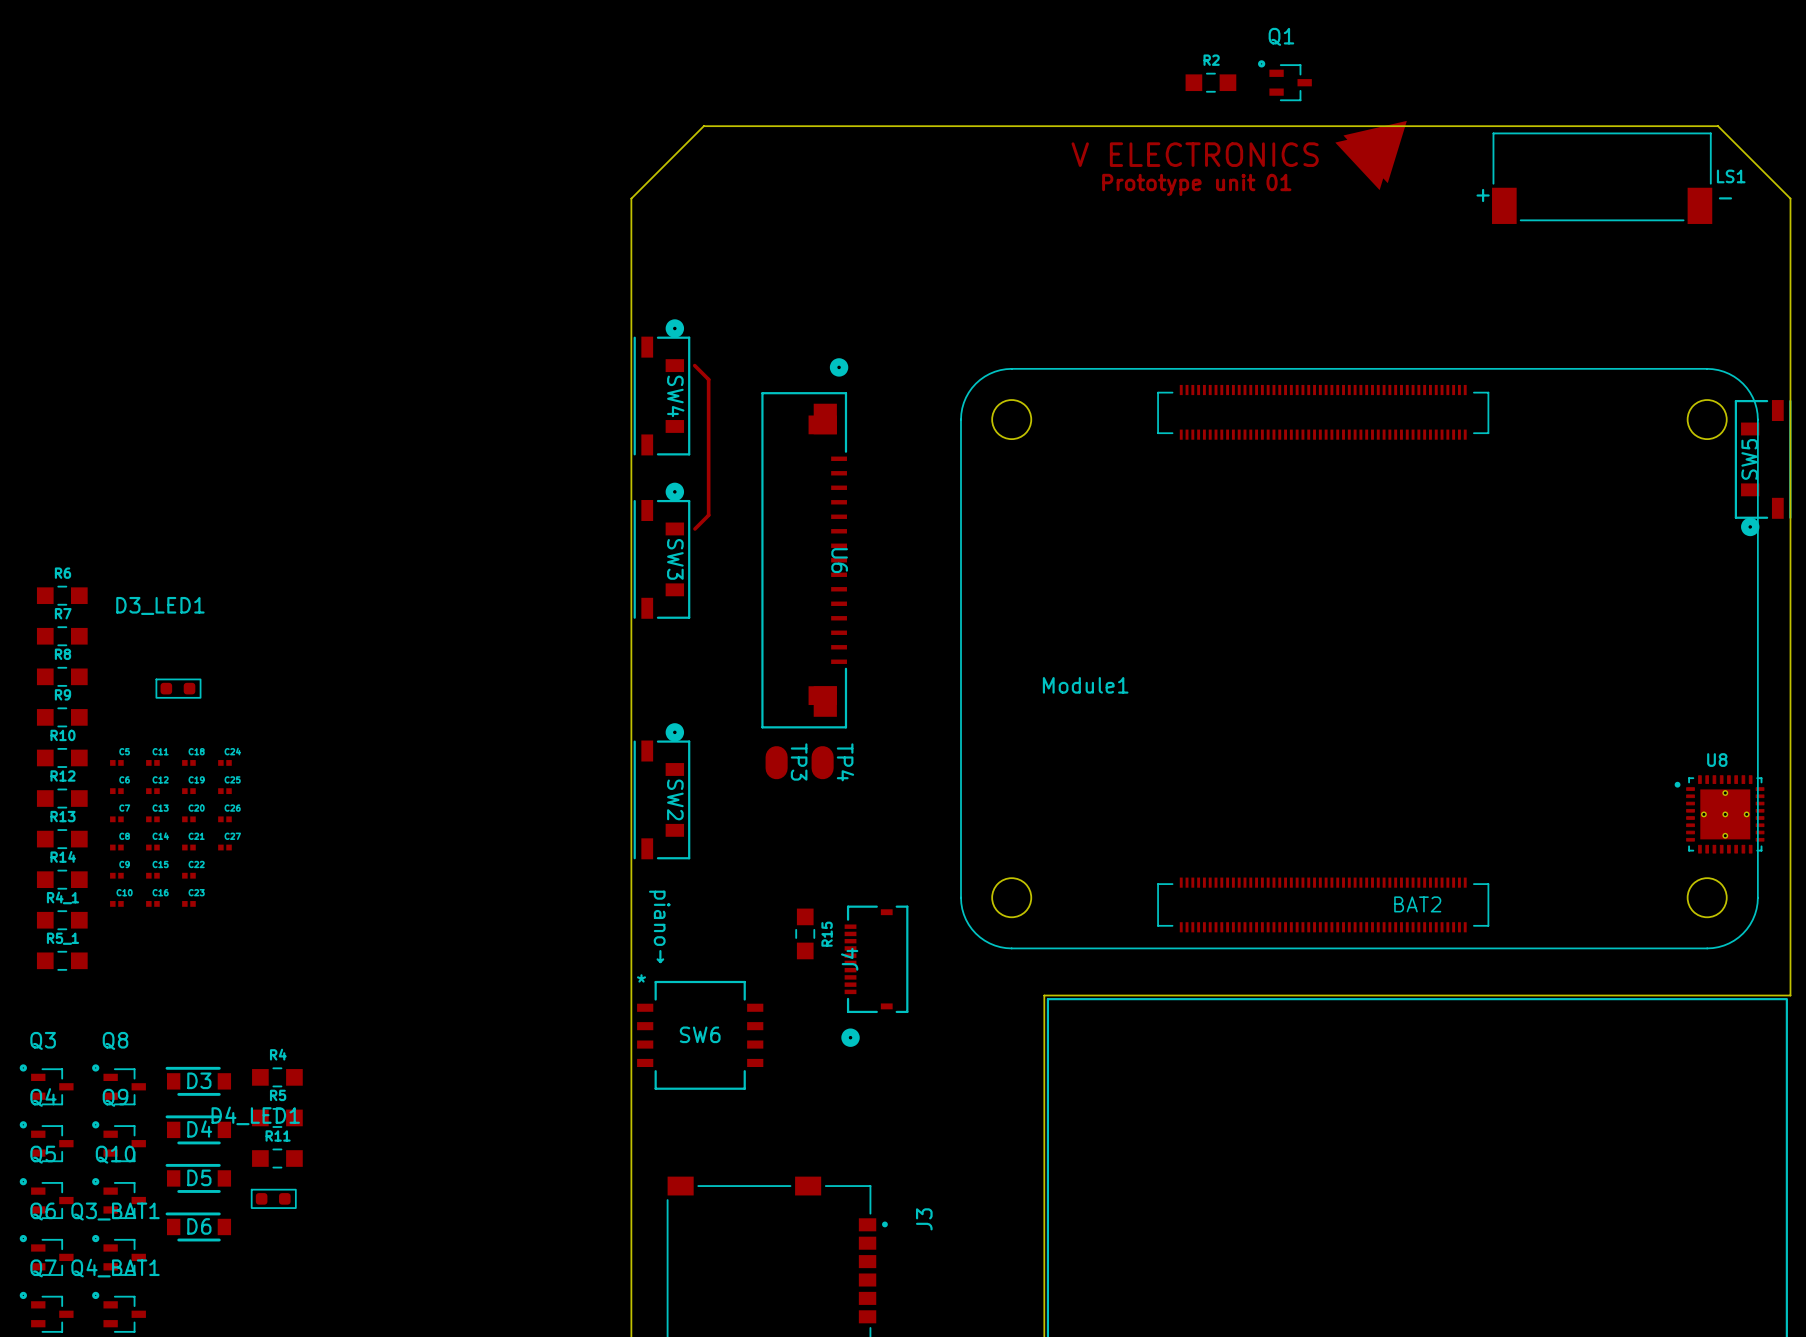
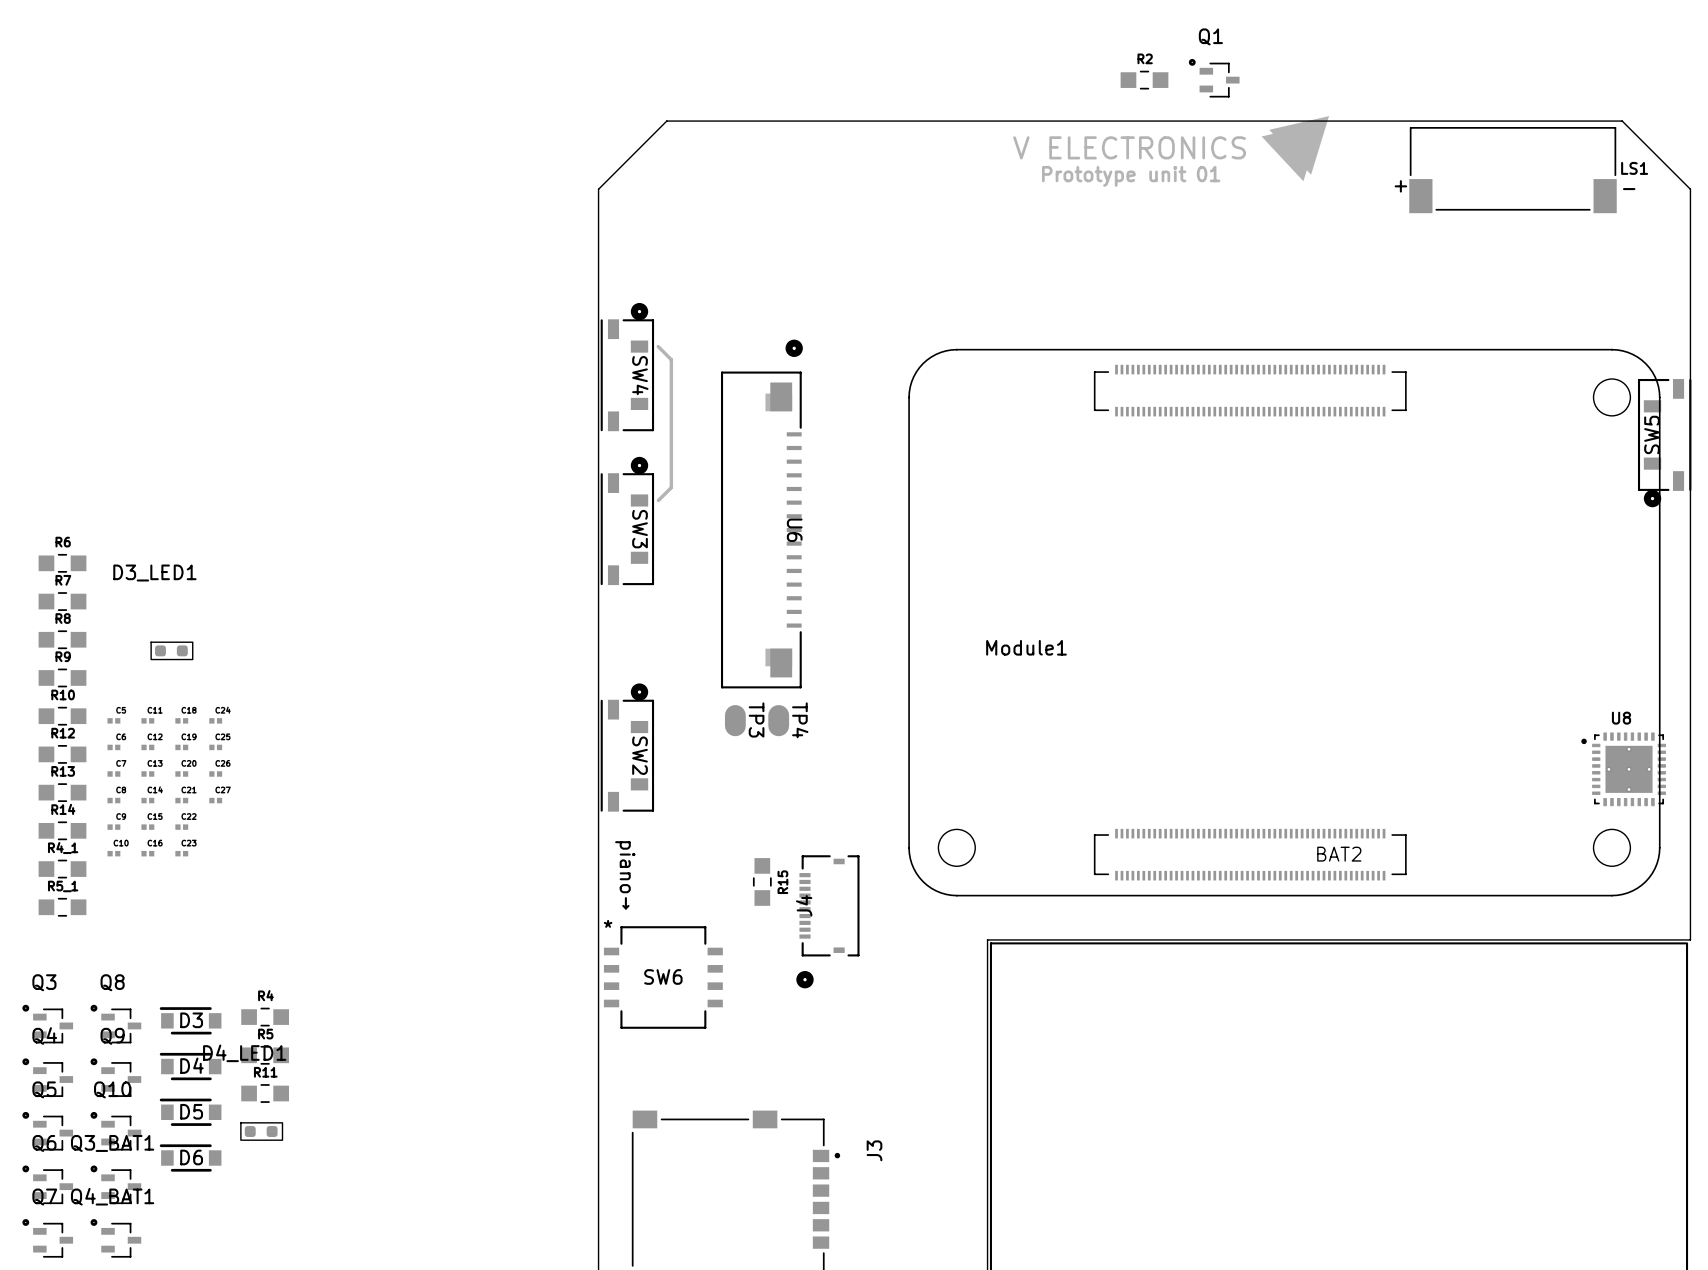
Module1 footprint: [960, 367, 1759, 950] -> [908, 348, 1661, 897]

